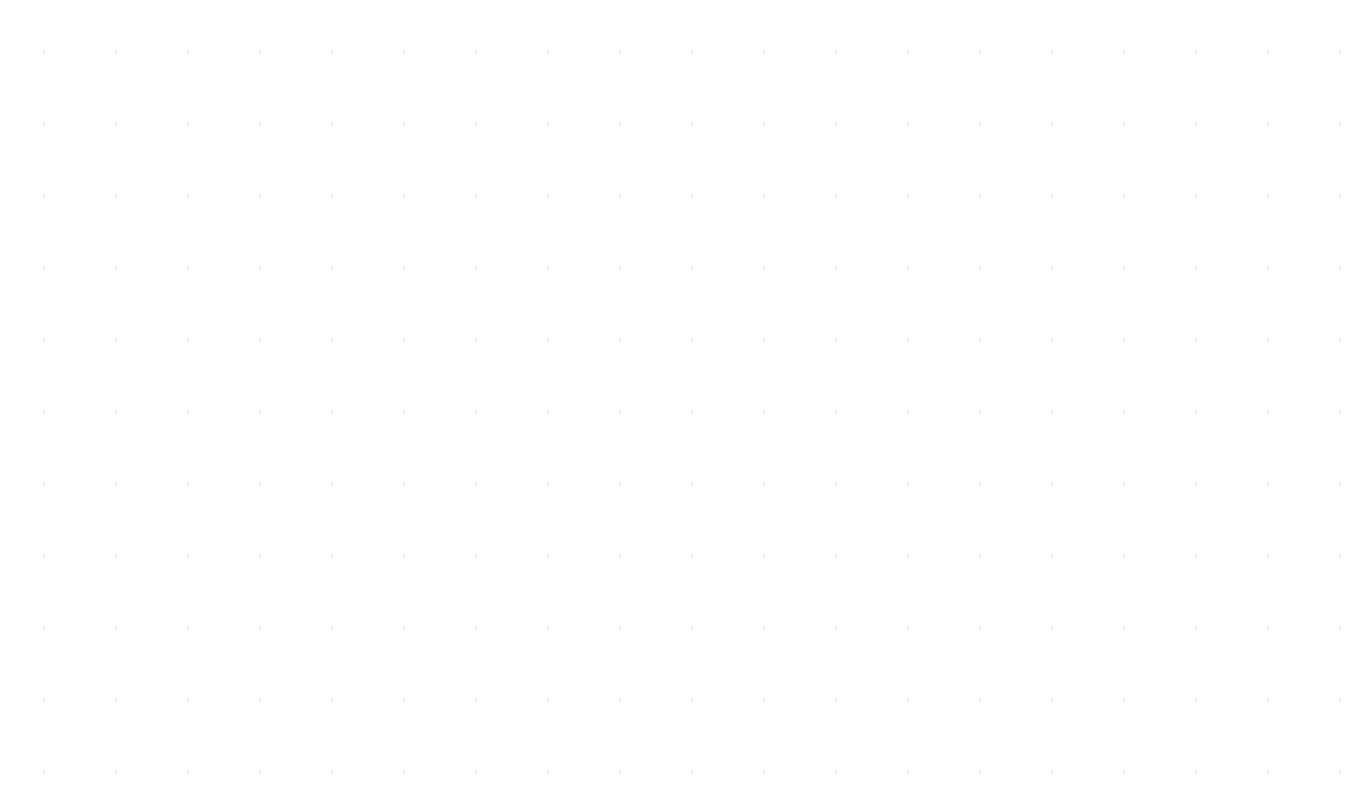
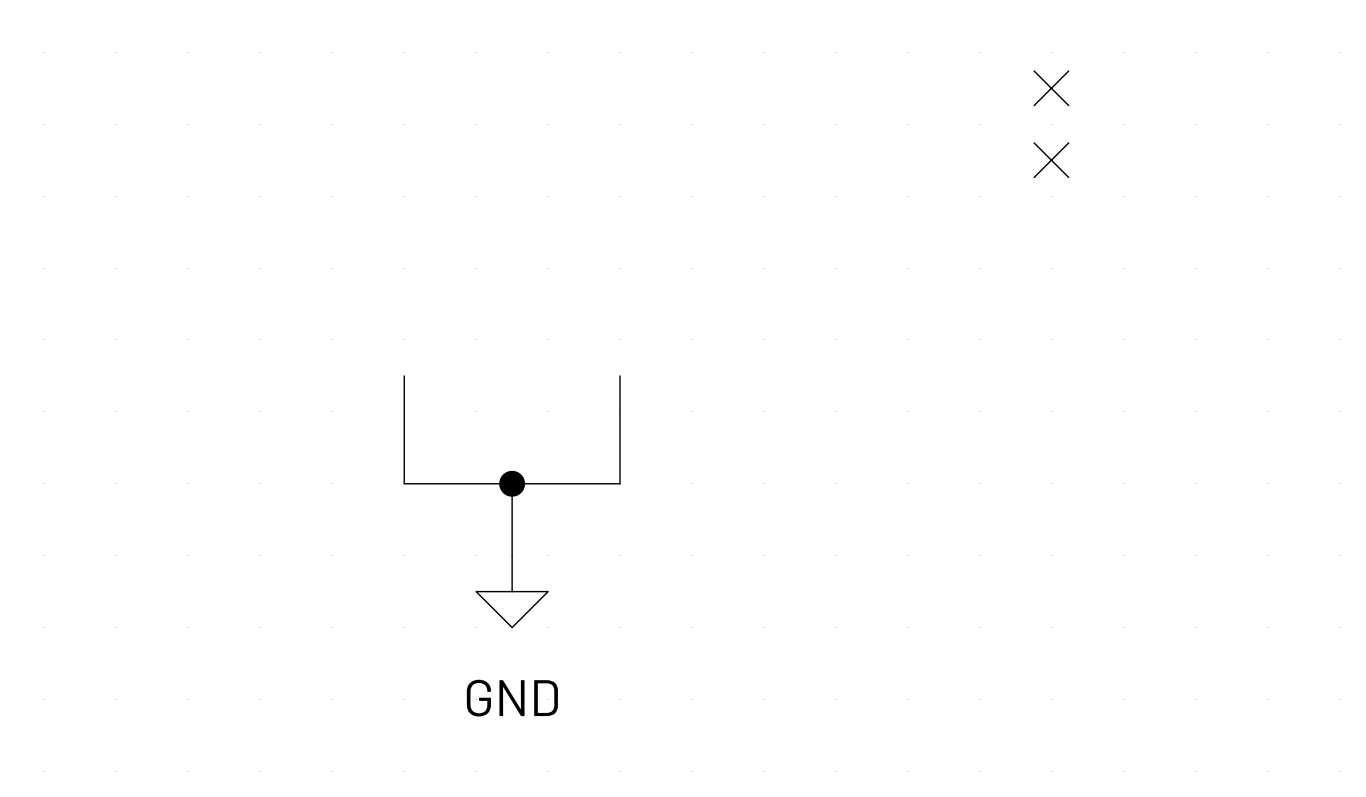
no-connect mark: none -> (1051, 88)
no-connect mark: none -> (1051, 160)
wire: none -> (404, 375) (404, 483) (619, 483) (619, 375)
wire: none -> (512, 483) (512, 555)
junction: none -> (512, 483)
power symbol: none -> GND (512, 591)

